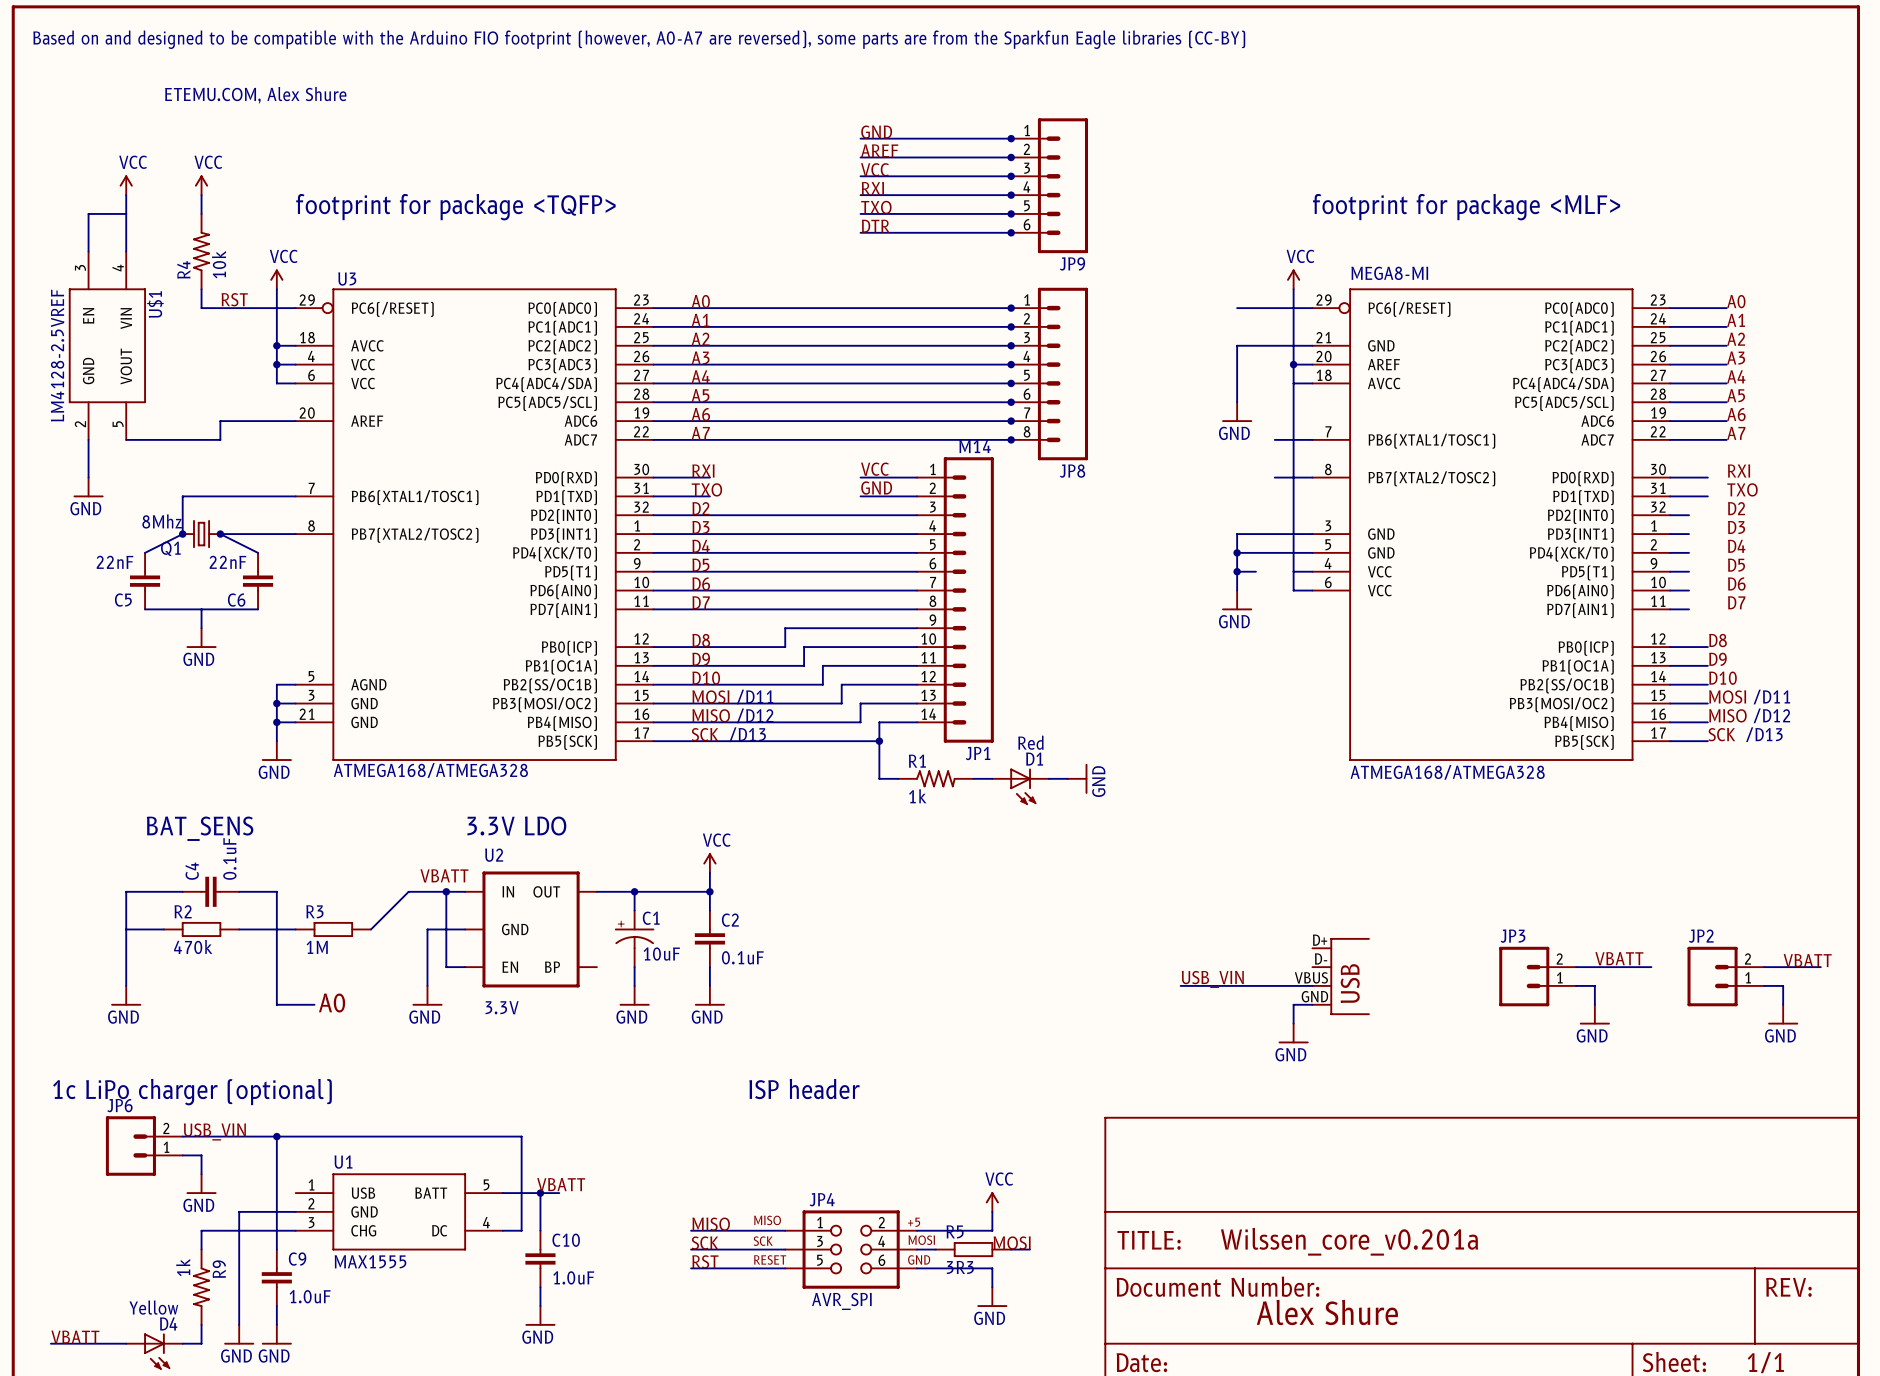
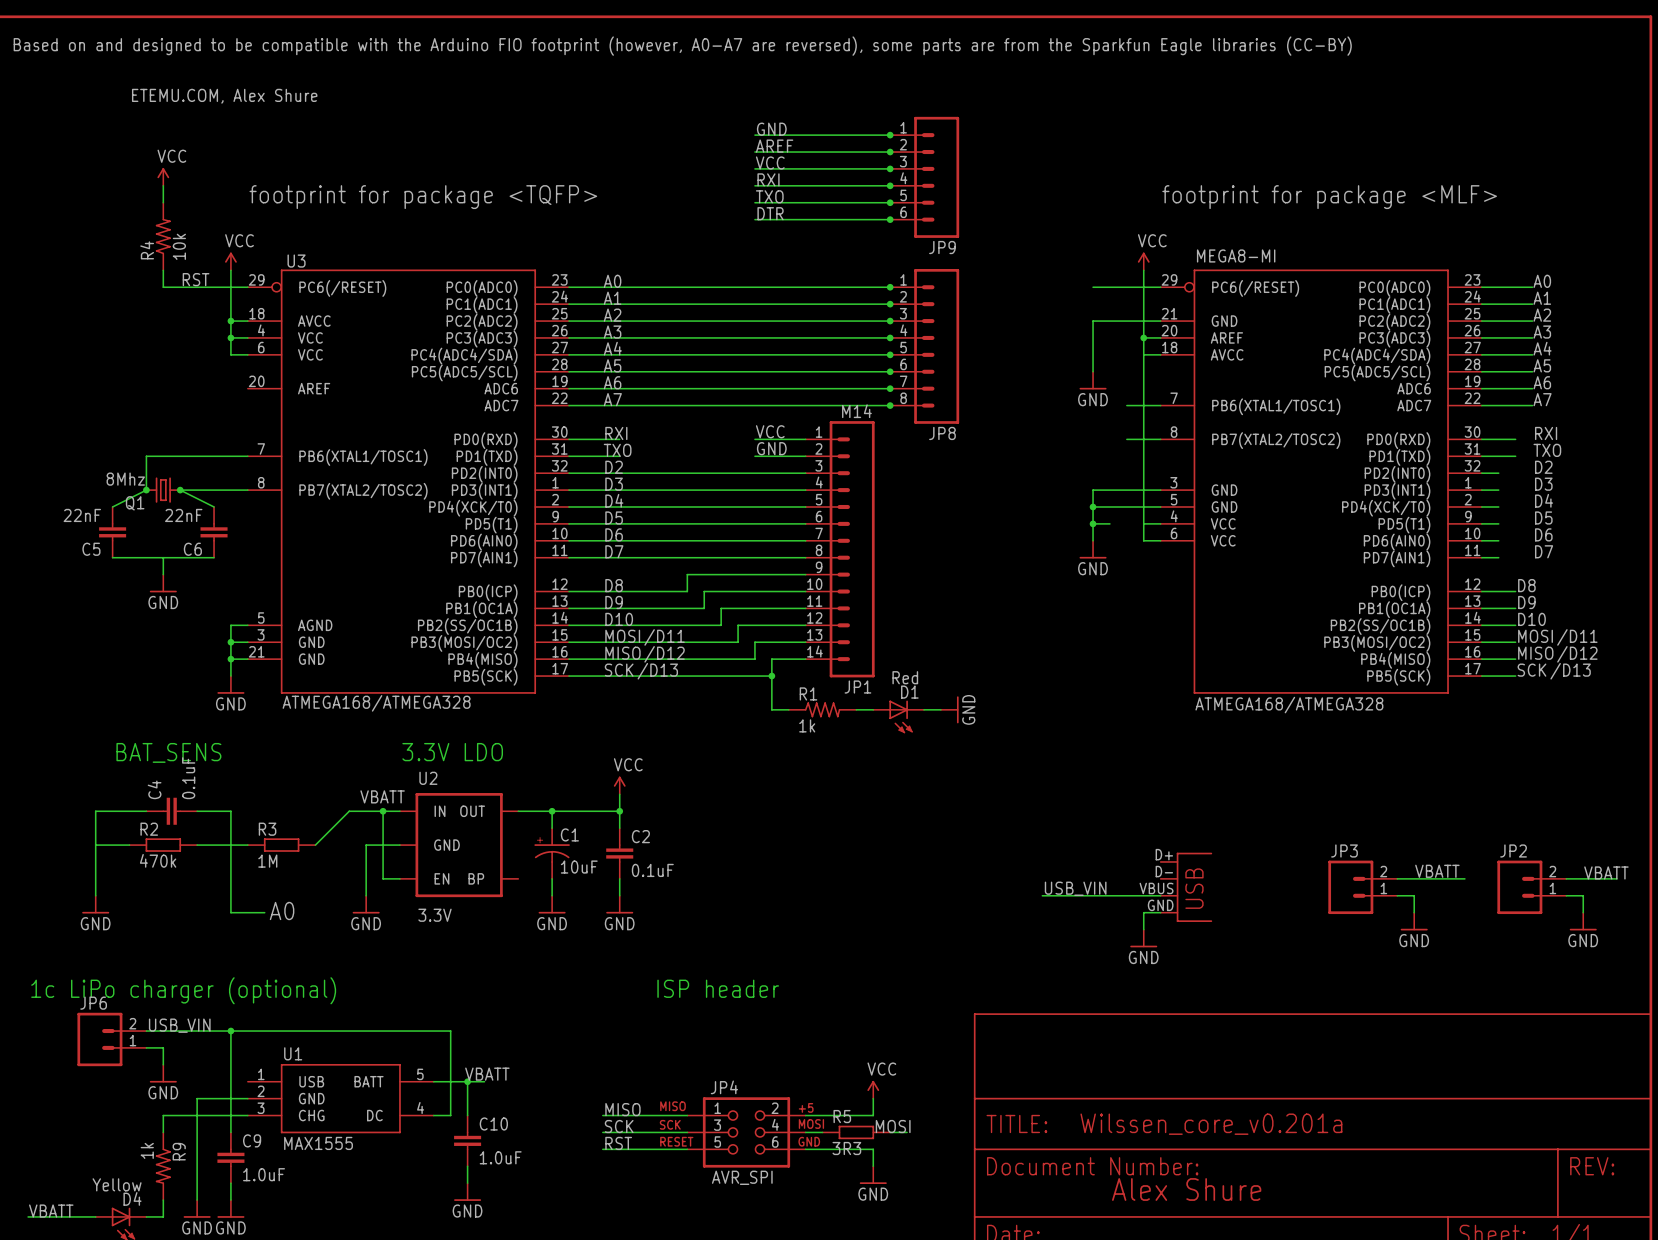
power symbol: VCC (126, 185) -> none
wire: (126, 195) (126, 251) -> none
wire: (126, 213) (88, 213) (88, 251) -> none
U$1: LM4128-2.5VREF (107, 345) -> none
wire: (295, 421) (220, 421) (220, 439) (126, 439) -> none
wire: (88, 439) (88, 477) -> none
power symbol: GND (88, 487) -> none

